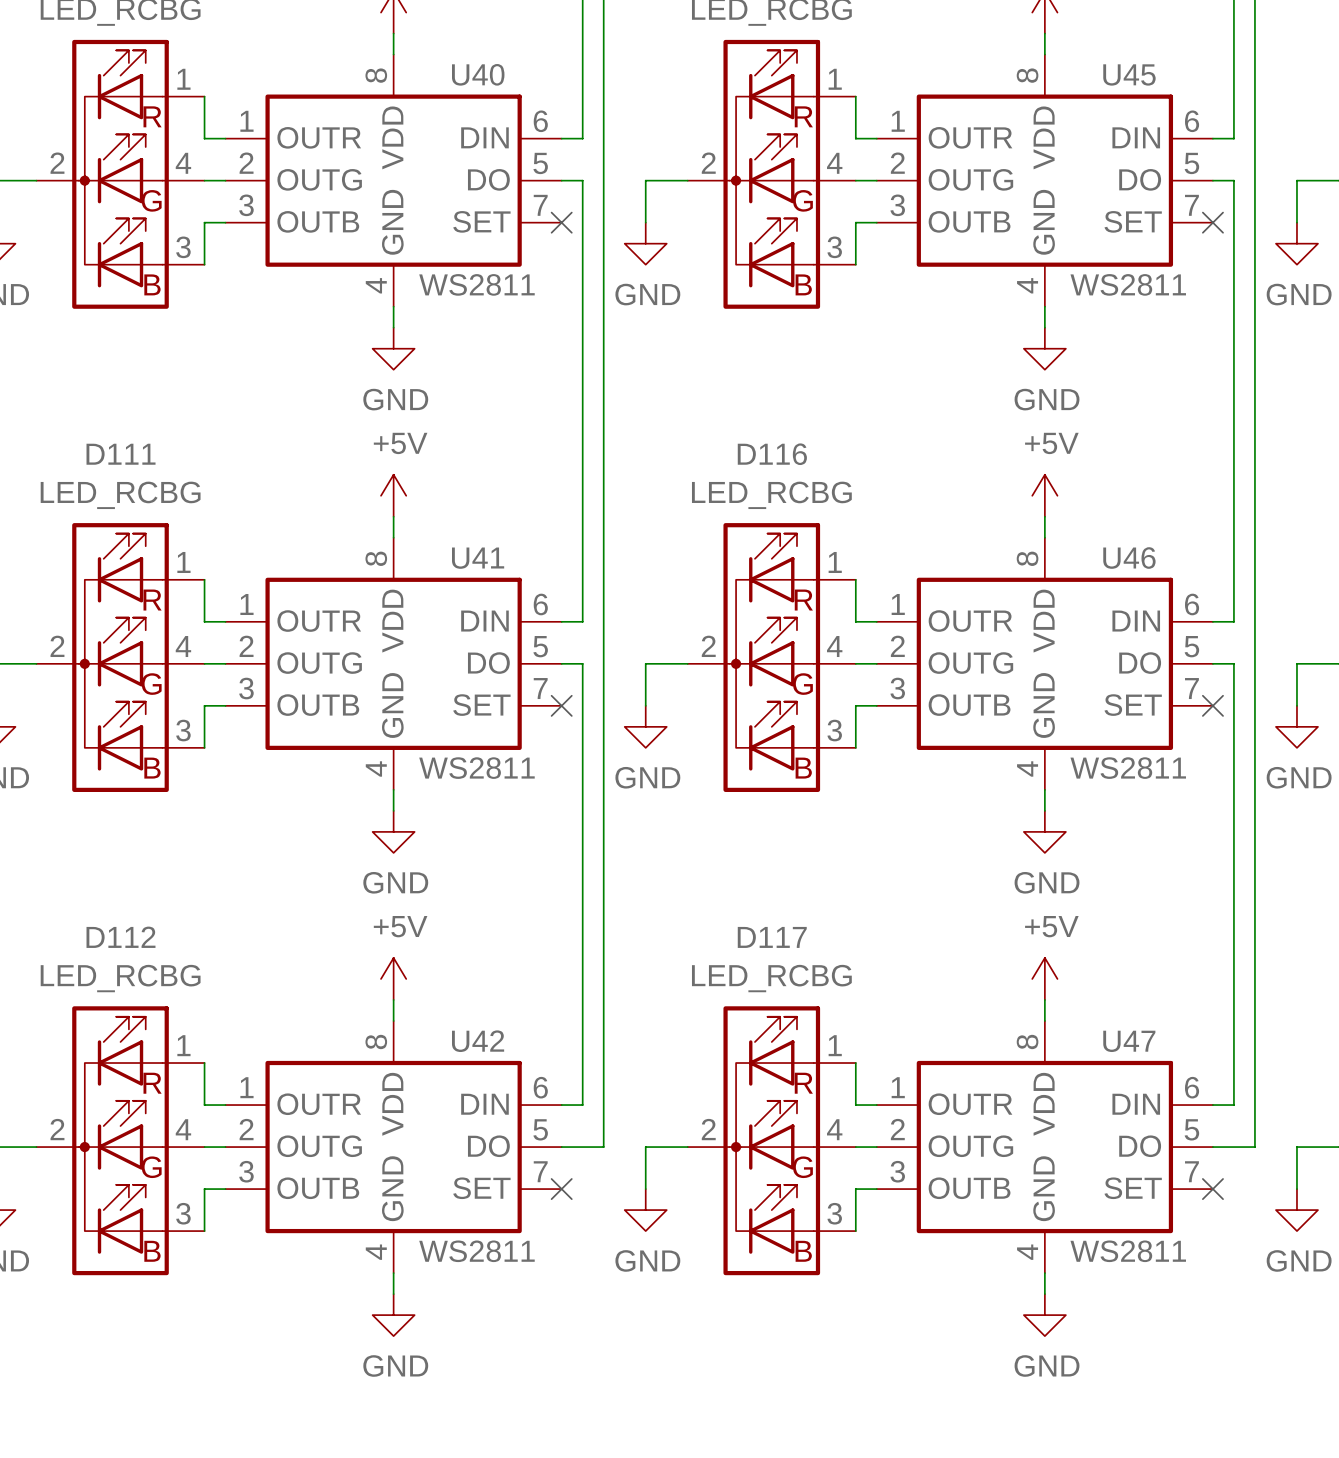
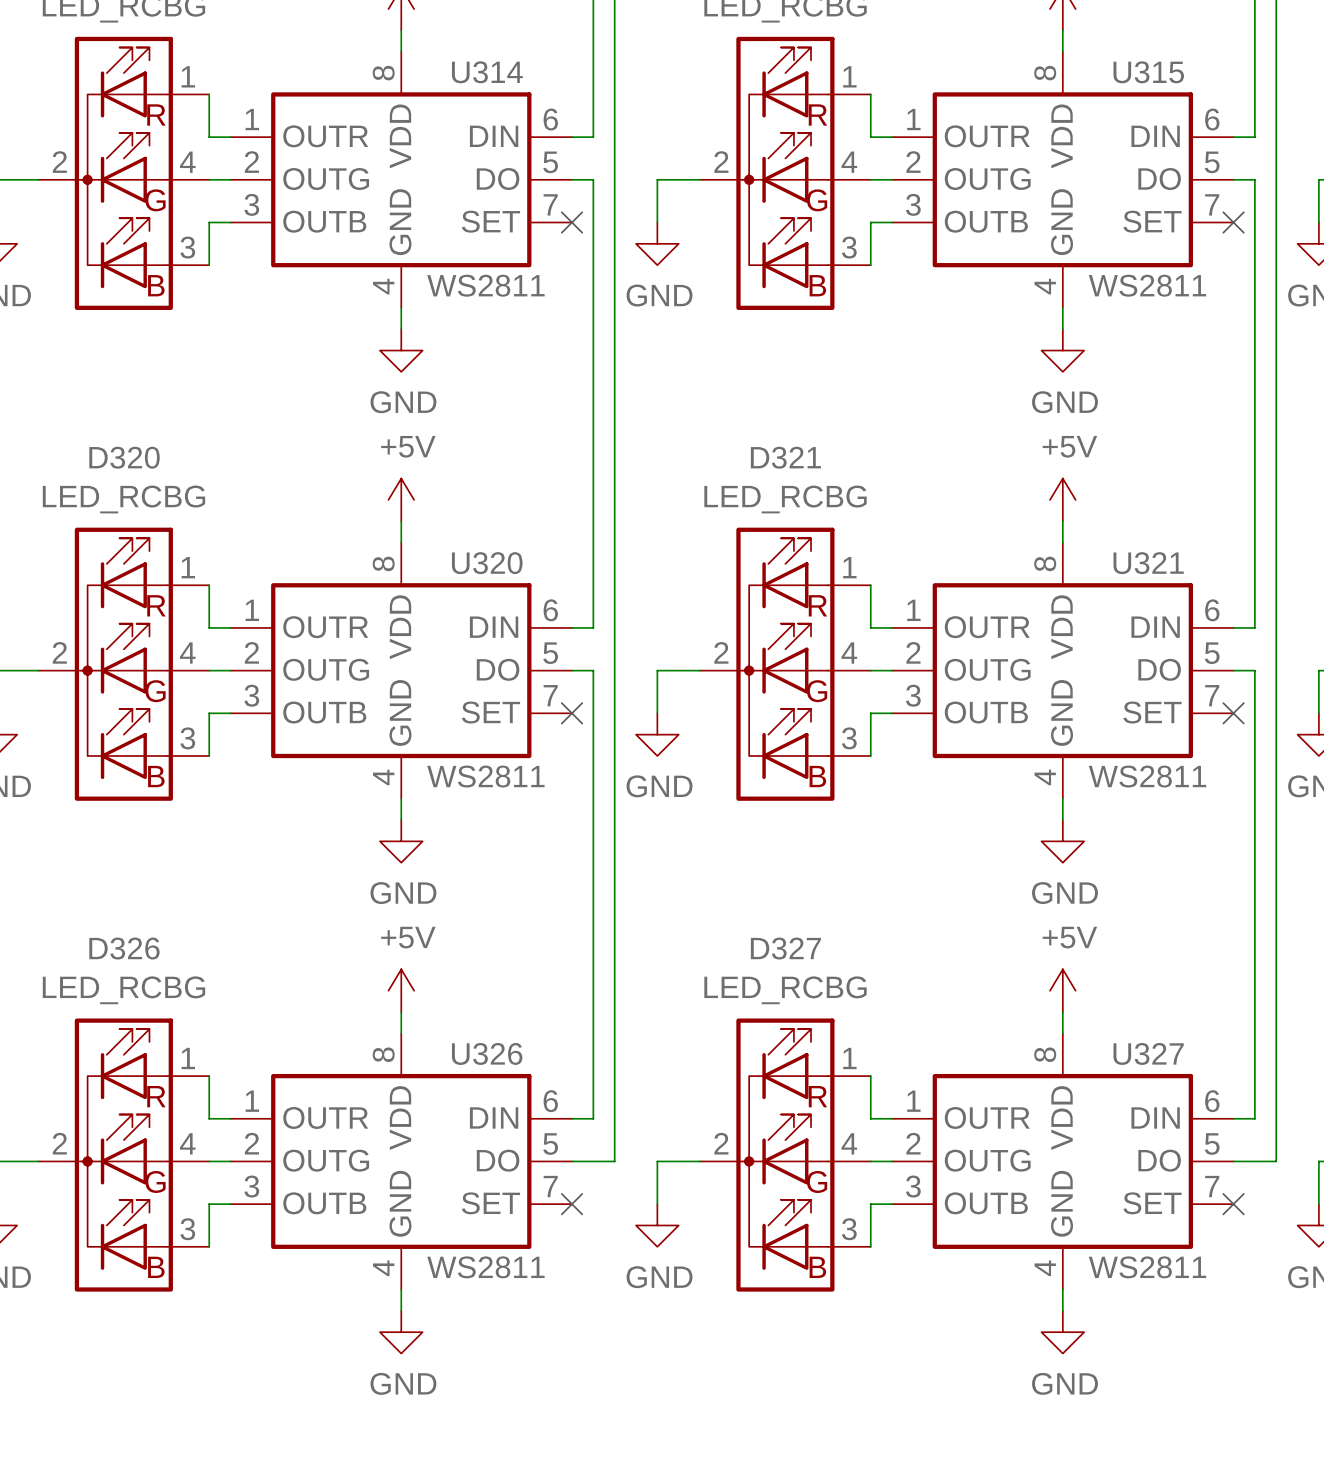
U40 name: U40 (478, 74) -> U314 (487, 72)
U45 name: U45 (1129, 74) -> U315 (1148, 72)
D111 name: D111 (121, 454) -> D320 (124, 457)
D116 name: D116 (772, 454) -> D321 (785, 457)
U41 name: U41 (478, 558) -> U320 (487, 563)
U46 name: U46 (1129, 558) -> U321 (1148, 563)
D112 name: D112 (120, 937) -> D326 (124, 948)
D117 name: D117 (772, 937) -> D327 (785, 948)
U42 name: U42 (478, 1041) -> U326 (487, 1053)
U47 name: U47 (1129, 1041) -> U327 (1148, 1053)

